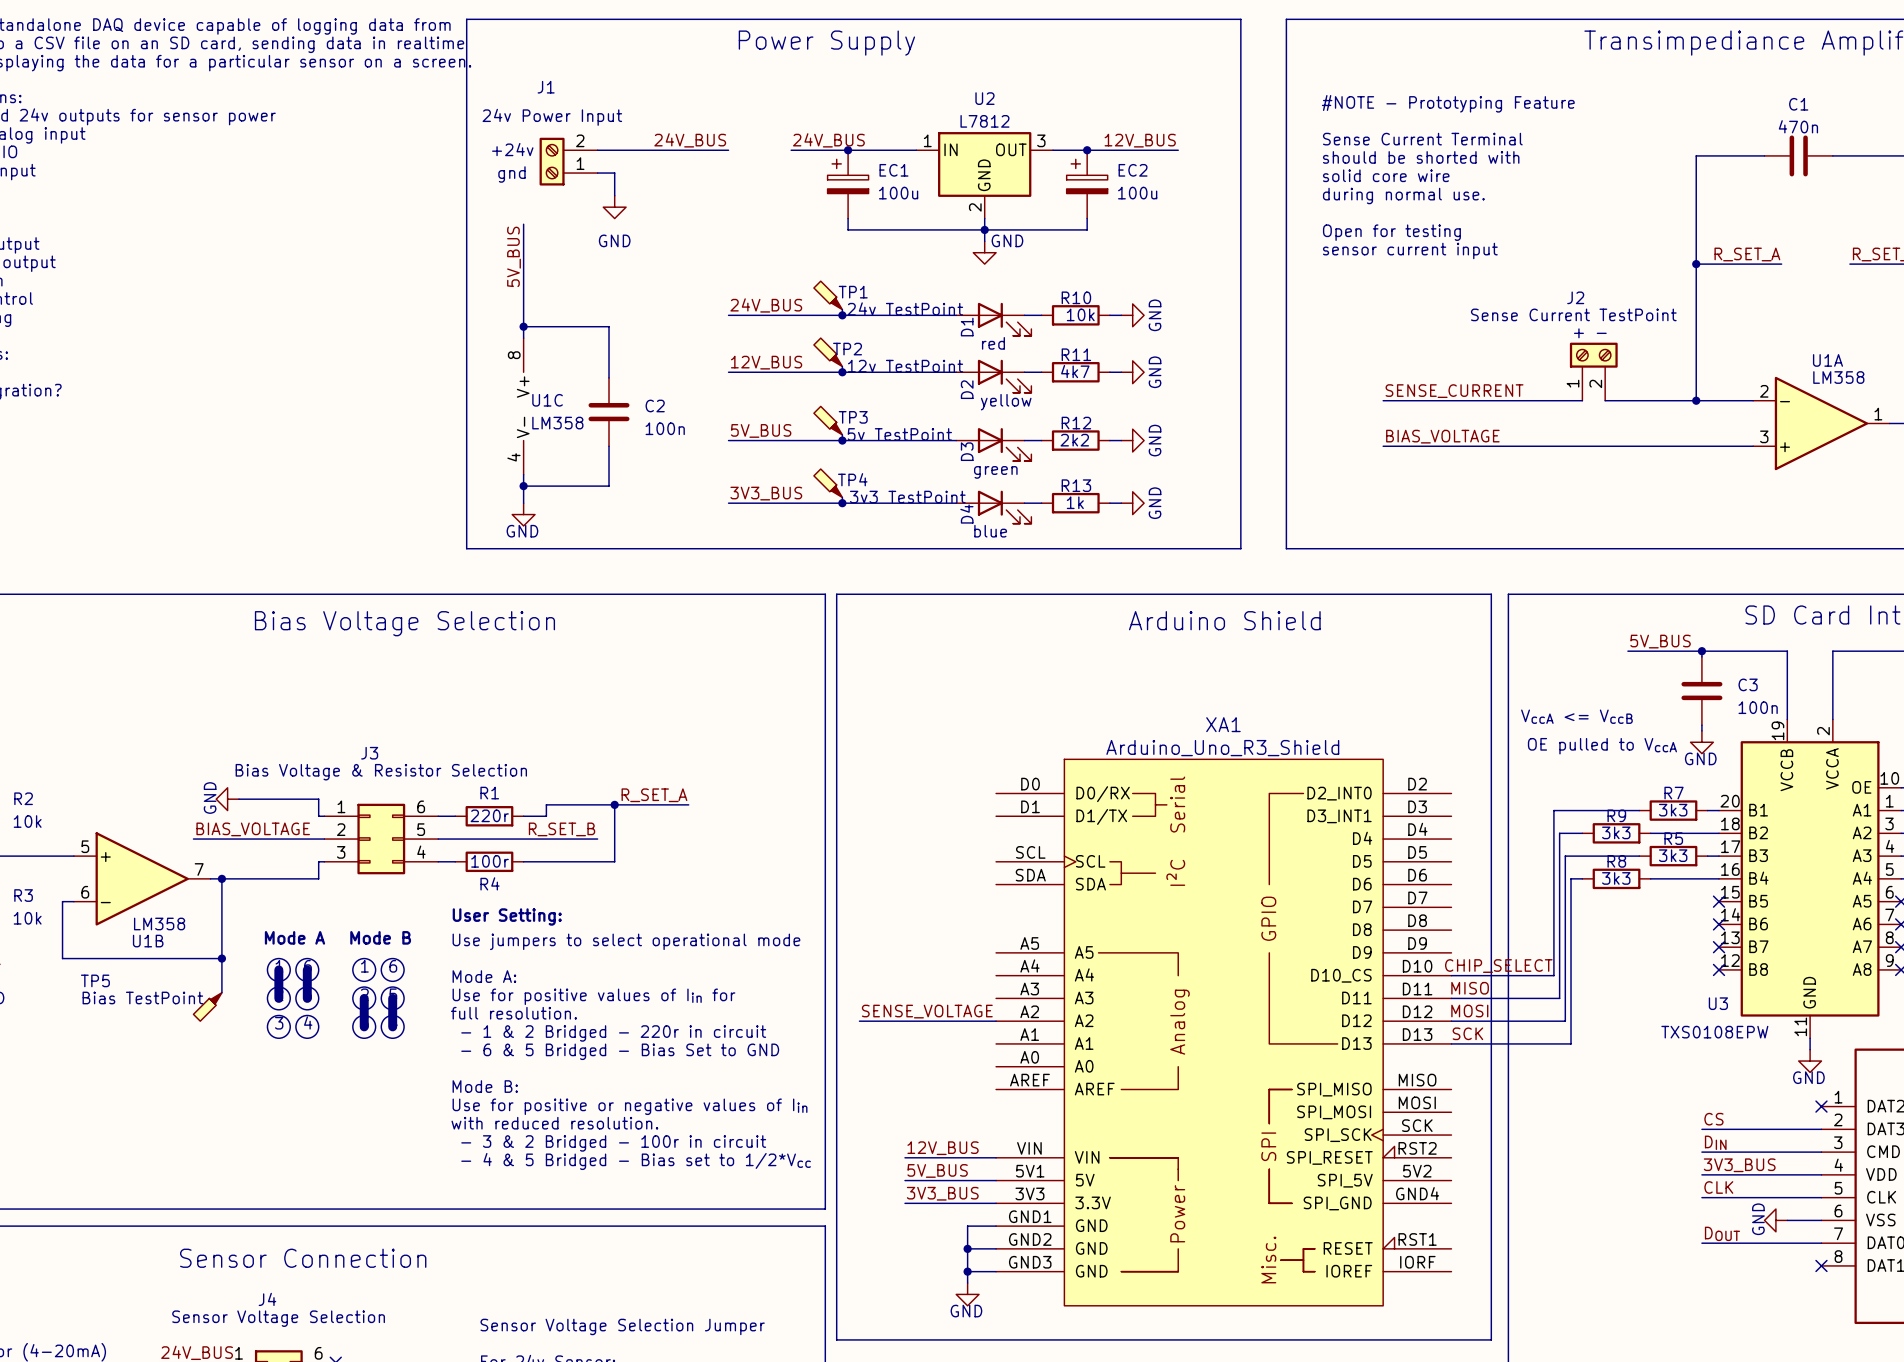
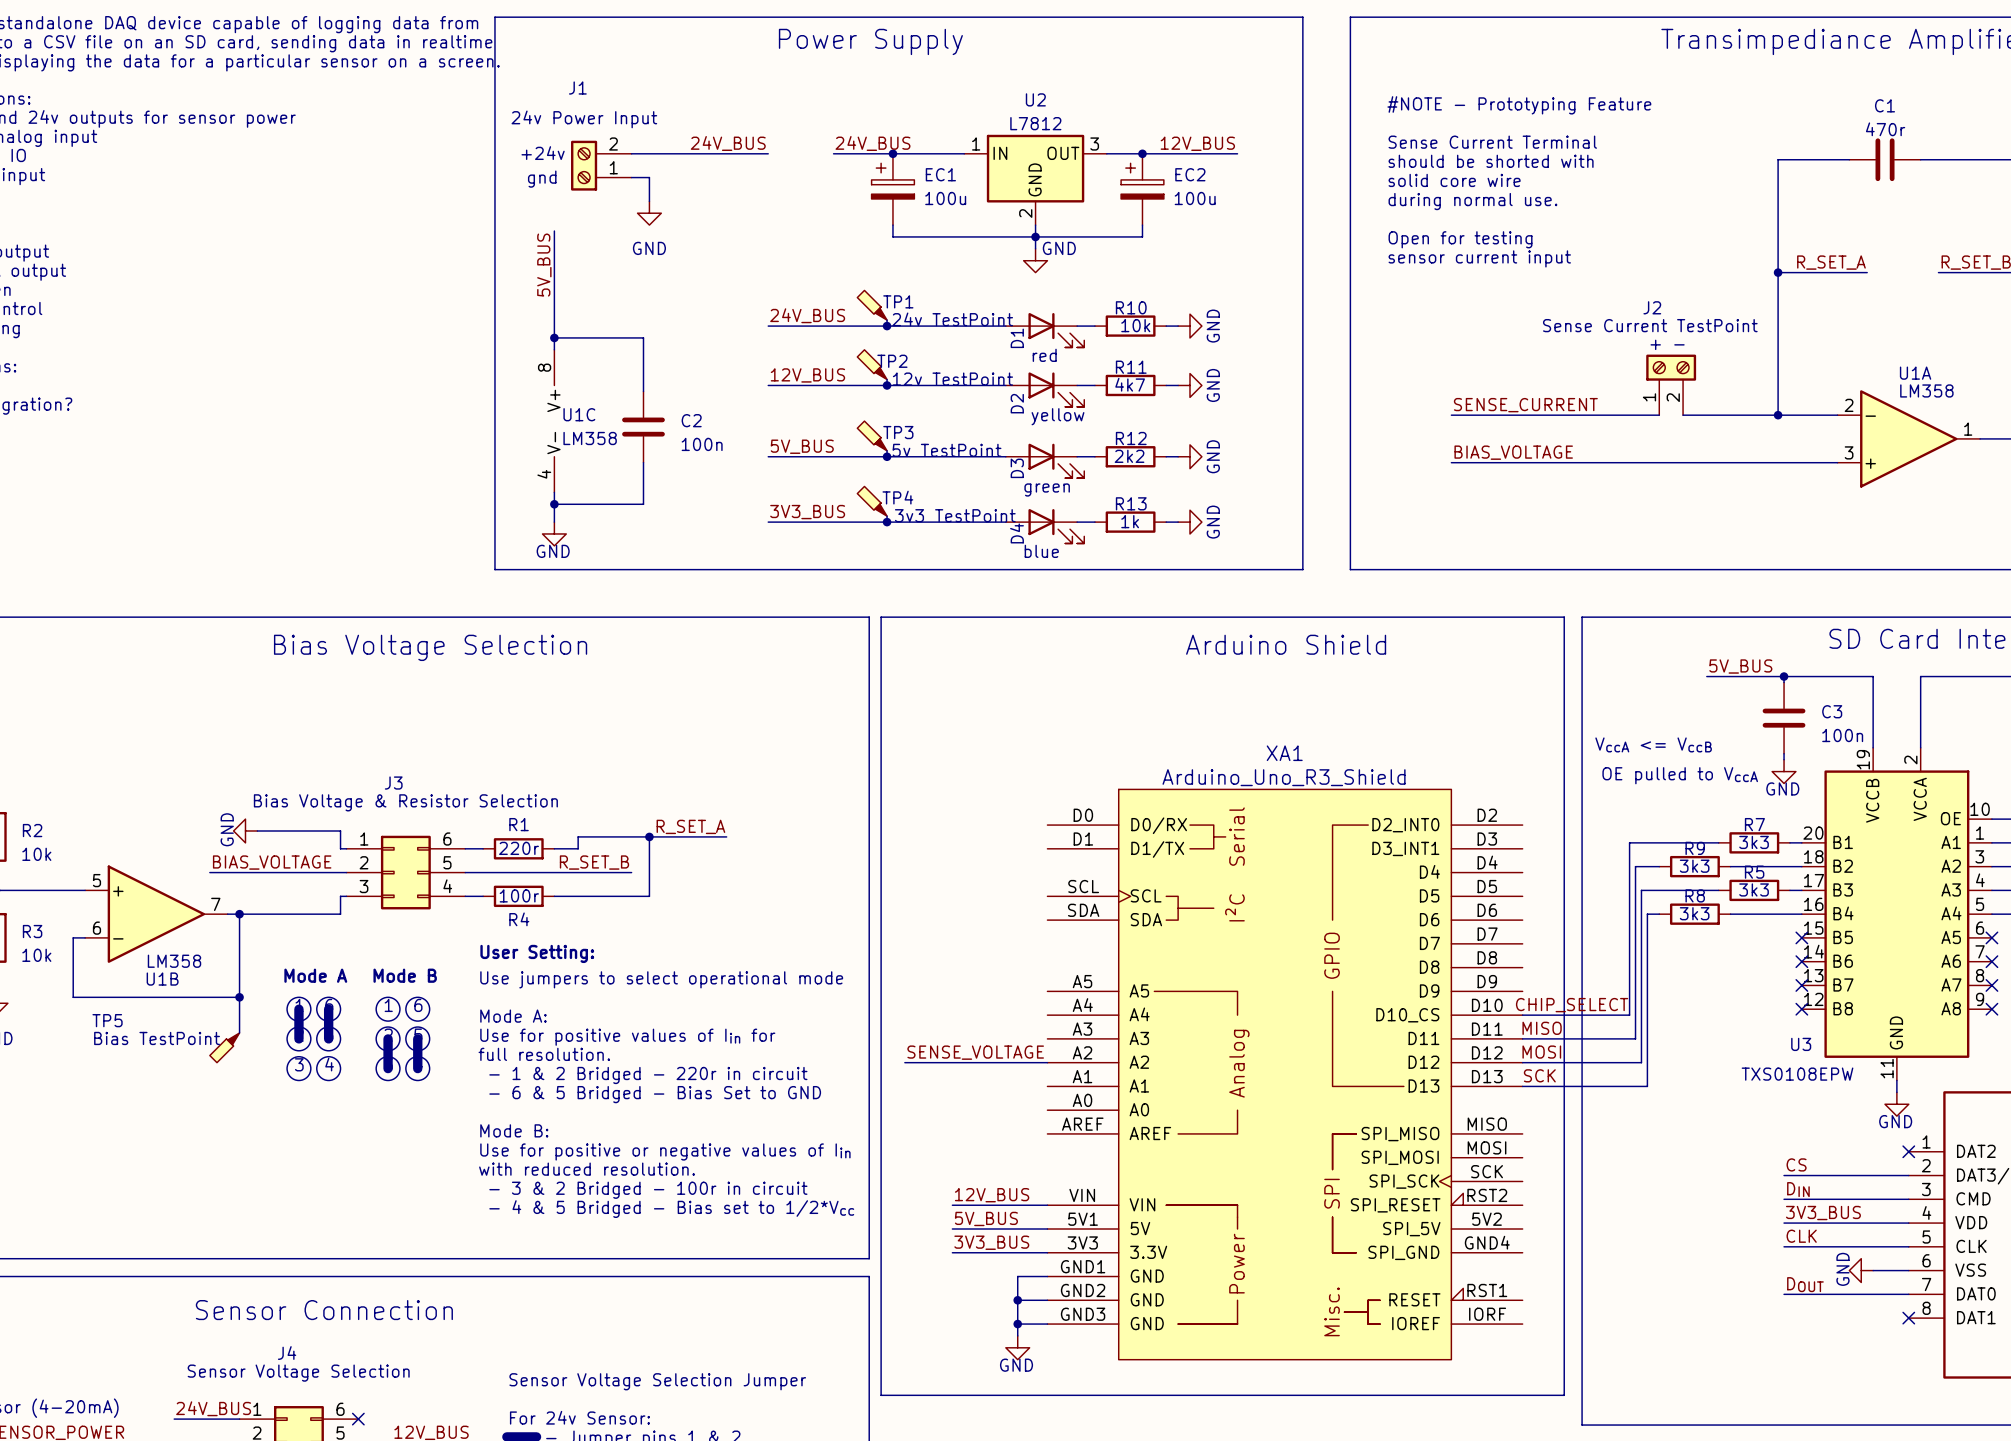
C1 value: 470n (1798, 126) -> 470r (1885, 129)

